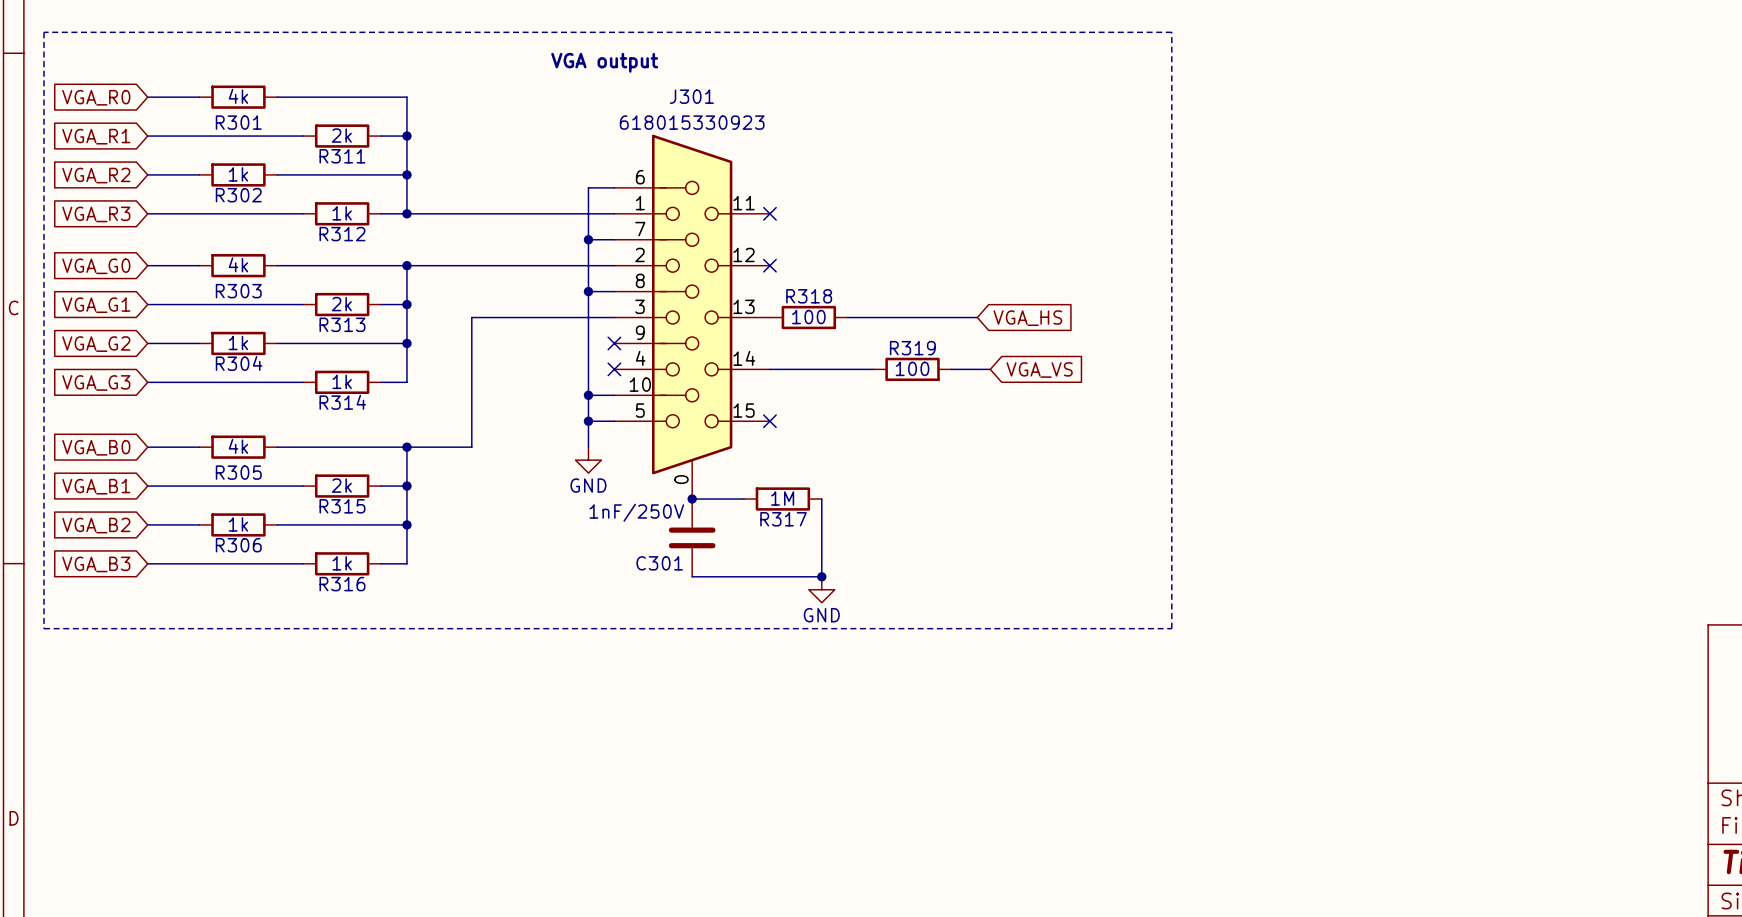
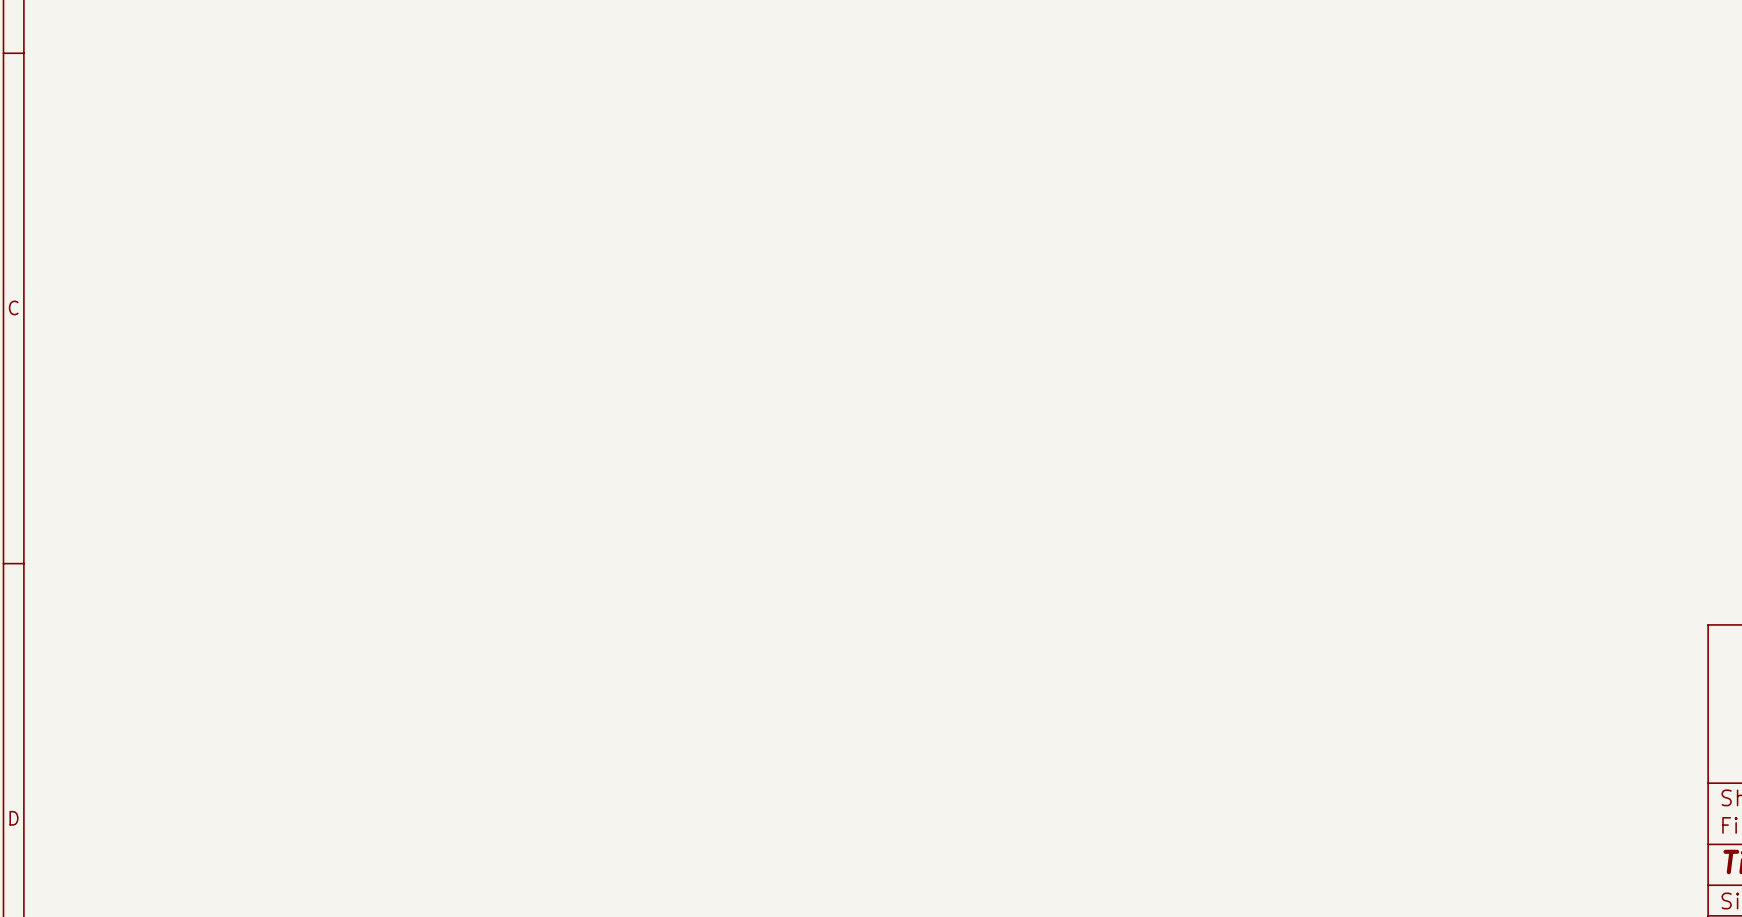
line: (44, 32) (1171, 32) (1171, 628) (44, 628) (44, 32) -> none
text: VGA output (604, 62) -> none
global label: VGA_R0 (96, 97) -> none
wire: (147, 97) (199, 97) -> none
R301: 4k (238, 97) -> none
wire: (277, 97) (406, 97) (406, 213) -> none
global label: VGA_R1 (96, 136) -> none
wire: (147, 136) (303, 136) -> none
R311: 2k (342, 136) -> none
wire: (381, 136) (406, 136) -> none
junction: (406, 136) -> none
wire: (147, 174) (199, 174) -> none
R302: 1k (238, 174) -> none
wire: (277, 174) (406, 174) -> none
junction: (406, 174) -> none
global label: VGA_R2 (96, 175) -> none
wire: (614, 187) (588, 187) (588, 447) -> none
wire: (147, 213) (303, 213) -> none
R312: 1k (342, 213) -> none
wire: (381, 213) (614, 213) -> none
junction: (406, 213) -> none
no-connect mark: (769, 213) -> none
global label: VGA_R3 (96, 214) -> none
wire: (588, 239) (614, 239) -> none
junction: (588, 239) -> none
wire: (147, 265) (199, 265) -> none
R303: 4k (238, 265) -> none
wire: (277, 265) (614, 265) -> none
wire: (406, 265) (406, 382) (381, 382) -> none
junction: (406, 265) -> none
no-connect mark: (769, 265) -> none
global label: VGA_G0 (96, 266) -> none
wire: (588, 291) (614, 291) -> none
junction: (588, 291) -> none
wire: (147, 304) (303, 304) -> none
R313: 2k (342, 304) -> none
wire: (381, 304) (406, 304) -> none
junction: (406, 304) -> none
global label: VGA_G1 (96, 305) -> none
J301: 618015330923 (692, 316) -> none
wire: (614, 317) (471, 317) (471, 447) (277, 447) -> none
R318: 100 (808, 317) -> none
wire: (847, 317) (977, 317) -> none
global label: VGA_HS (1027, 318) -> none
wire: (147, 343) (199, 343) -> none
R304: 1k (238, 343) -> none
wire: (277, 343) (406, 343) -> none
junction: (406, 343) -> none
no-connect mark: (614, 343) -> none
global label: VGA_G2 (96, 344) -> none
no-connect mark: (614, 369) -> none
wire: (769, 369) (873, 369) -> none
R319: 100 (912, 369) -> none
wire: (951, 369) (990, 369) -> none
global label: VGA_VS (1039, 370) -> none
global label: VGA_G3 (96, 382) -> none
wire: (147, 382) (303, 382) -> none
R314: 1k (342, 382) -> none
wire: (588, 395) (614, 395) -> none
junction: (588, 395) -> none
wire: (588, 421) (614, 421) -> none
junction: (588, 421) -> none
no-connect mark: (769, 421) -> none
global label: VGA_B0 (96, 447) -> none
wire: (147, 447) (199, 447) -> none
R305: 4k (238, 447) -> none
wire: (406, 447) (406, 563) (381, 563) -> none
junction: (406, 447) -> none
power symbol: GND (588, 460) -> none
global label: VGA_B1 (96, 486) -> none
wire: (147, 486) (303, 486) -> none
R315: 2k (342, 486) -> none
wire: (381, 486) (406, 486) -> none
junction: (406, 486) -> none
wire: (692, 499) (744, 499) -> none
junction: (692, 499) -> none
R317: 1M (782, 499) -> none
wire: (821, 499) (821, 576) (692, 576) -> none
wire: (147, 524) (199, 524) -> none
R306: 1k (238, 524) -> none
wire: (277, 524) (406, 524) -> none
junction: (406, 524) -> none
global label: VGA_B2 (96, 525) -> none
C301: 1nF/250V (692, 537) -> none
wire: (147, 563) (303, 563) -> none
R316: 1k (342, 563) -> none
global label: VGA_B3 (96, 564) -> none
junction: (821, 576) -> none
power symbol: GND (821, 589) -> none

